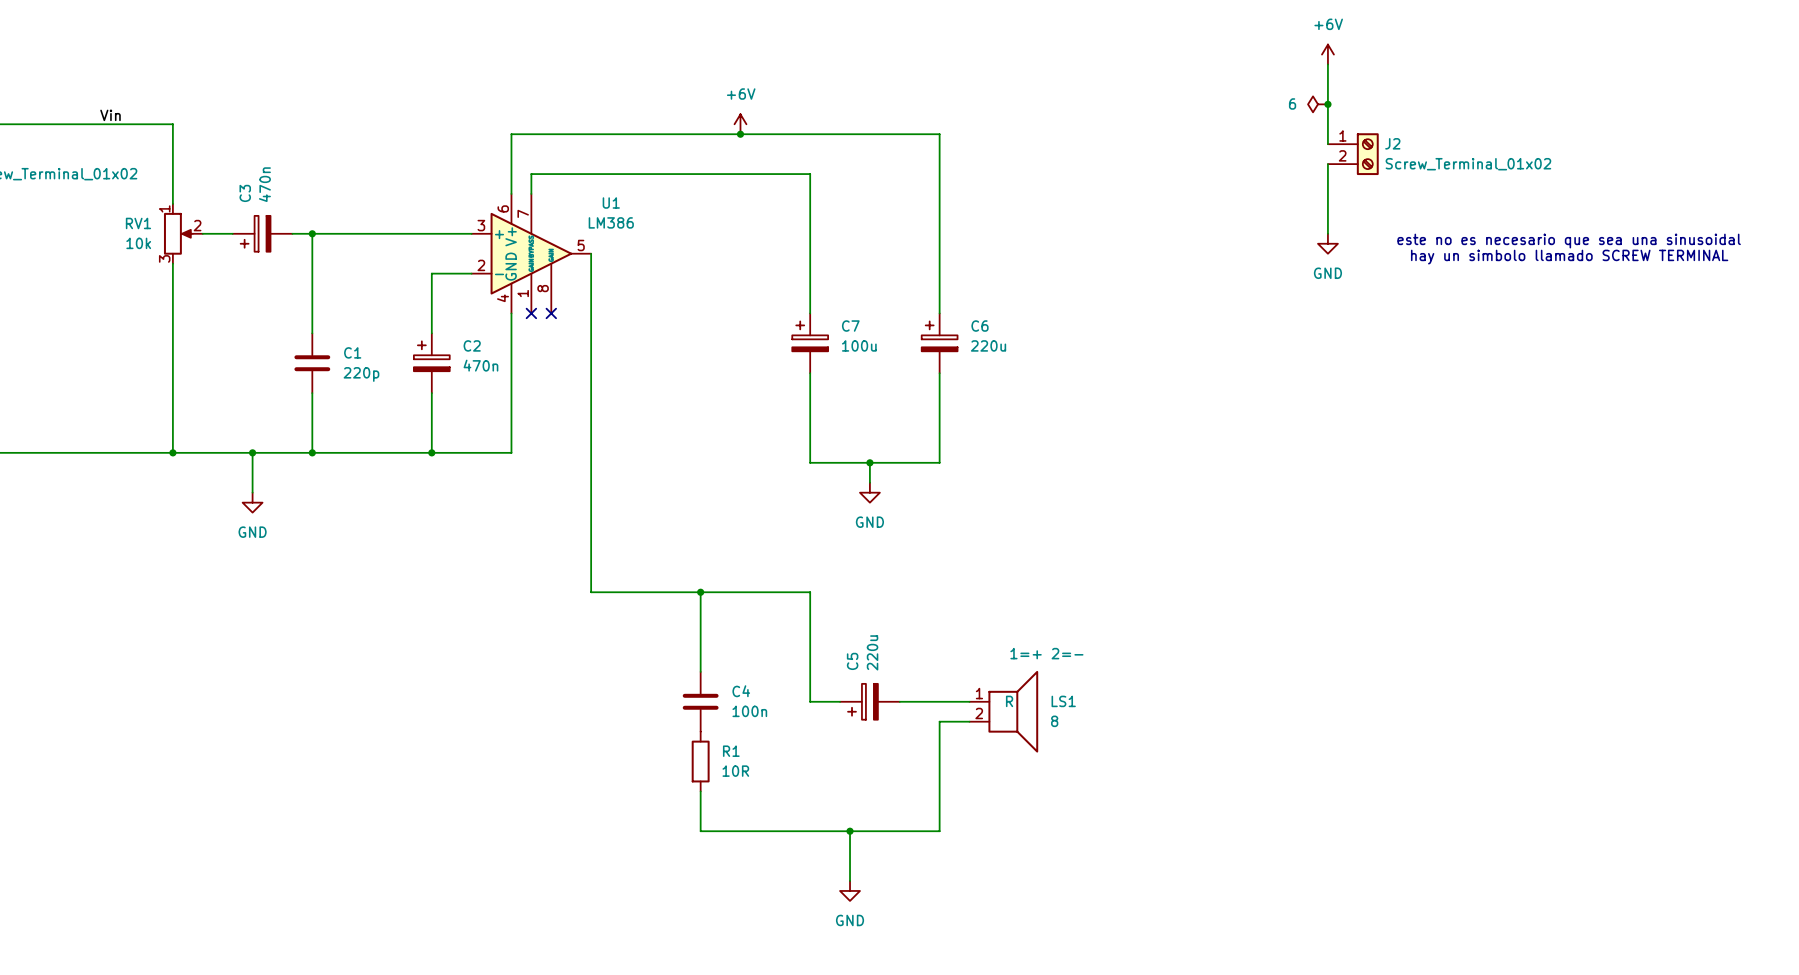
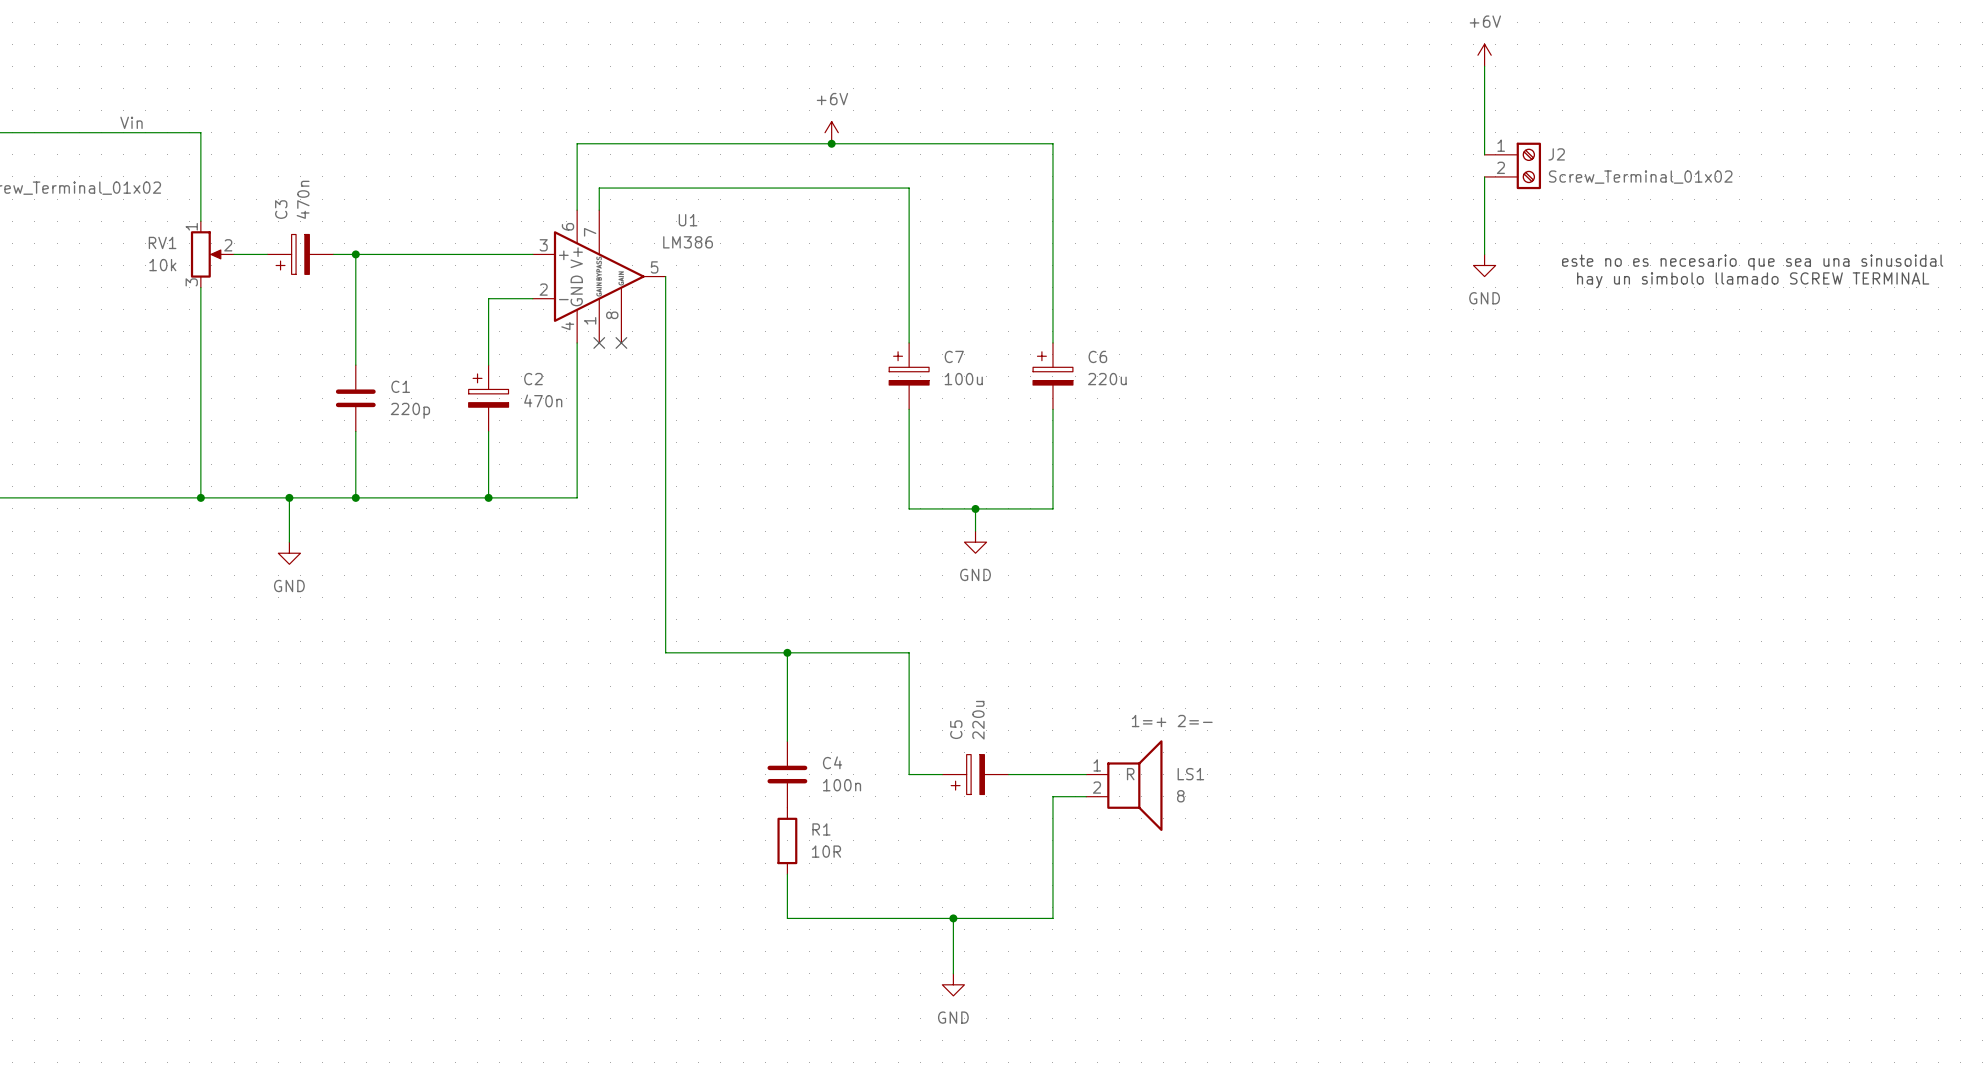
power symbol: 6 (1318, 104) -> none
junction: (1327, 104) -> none

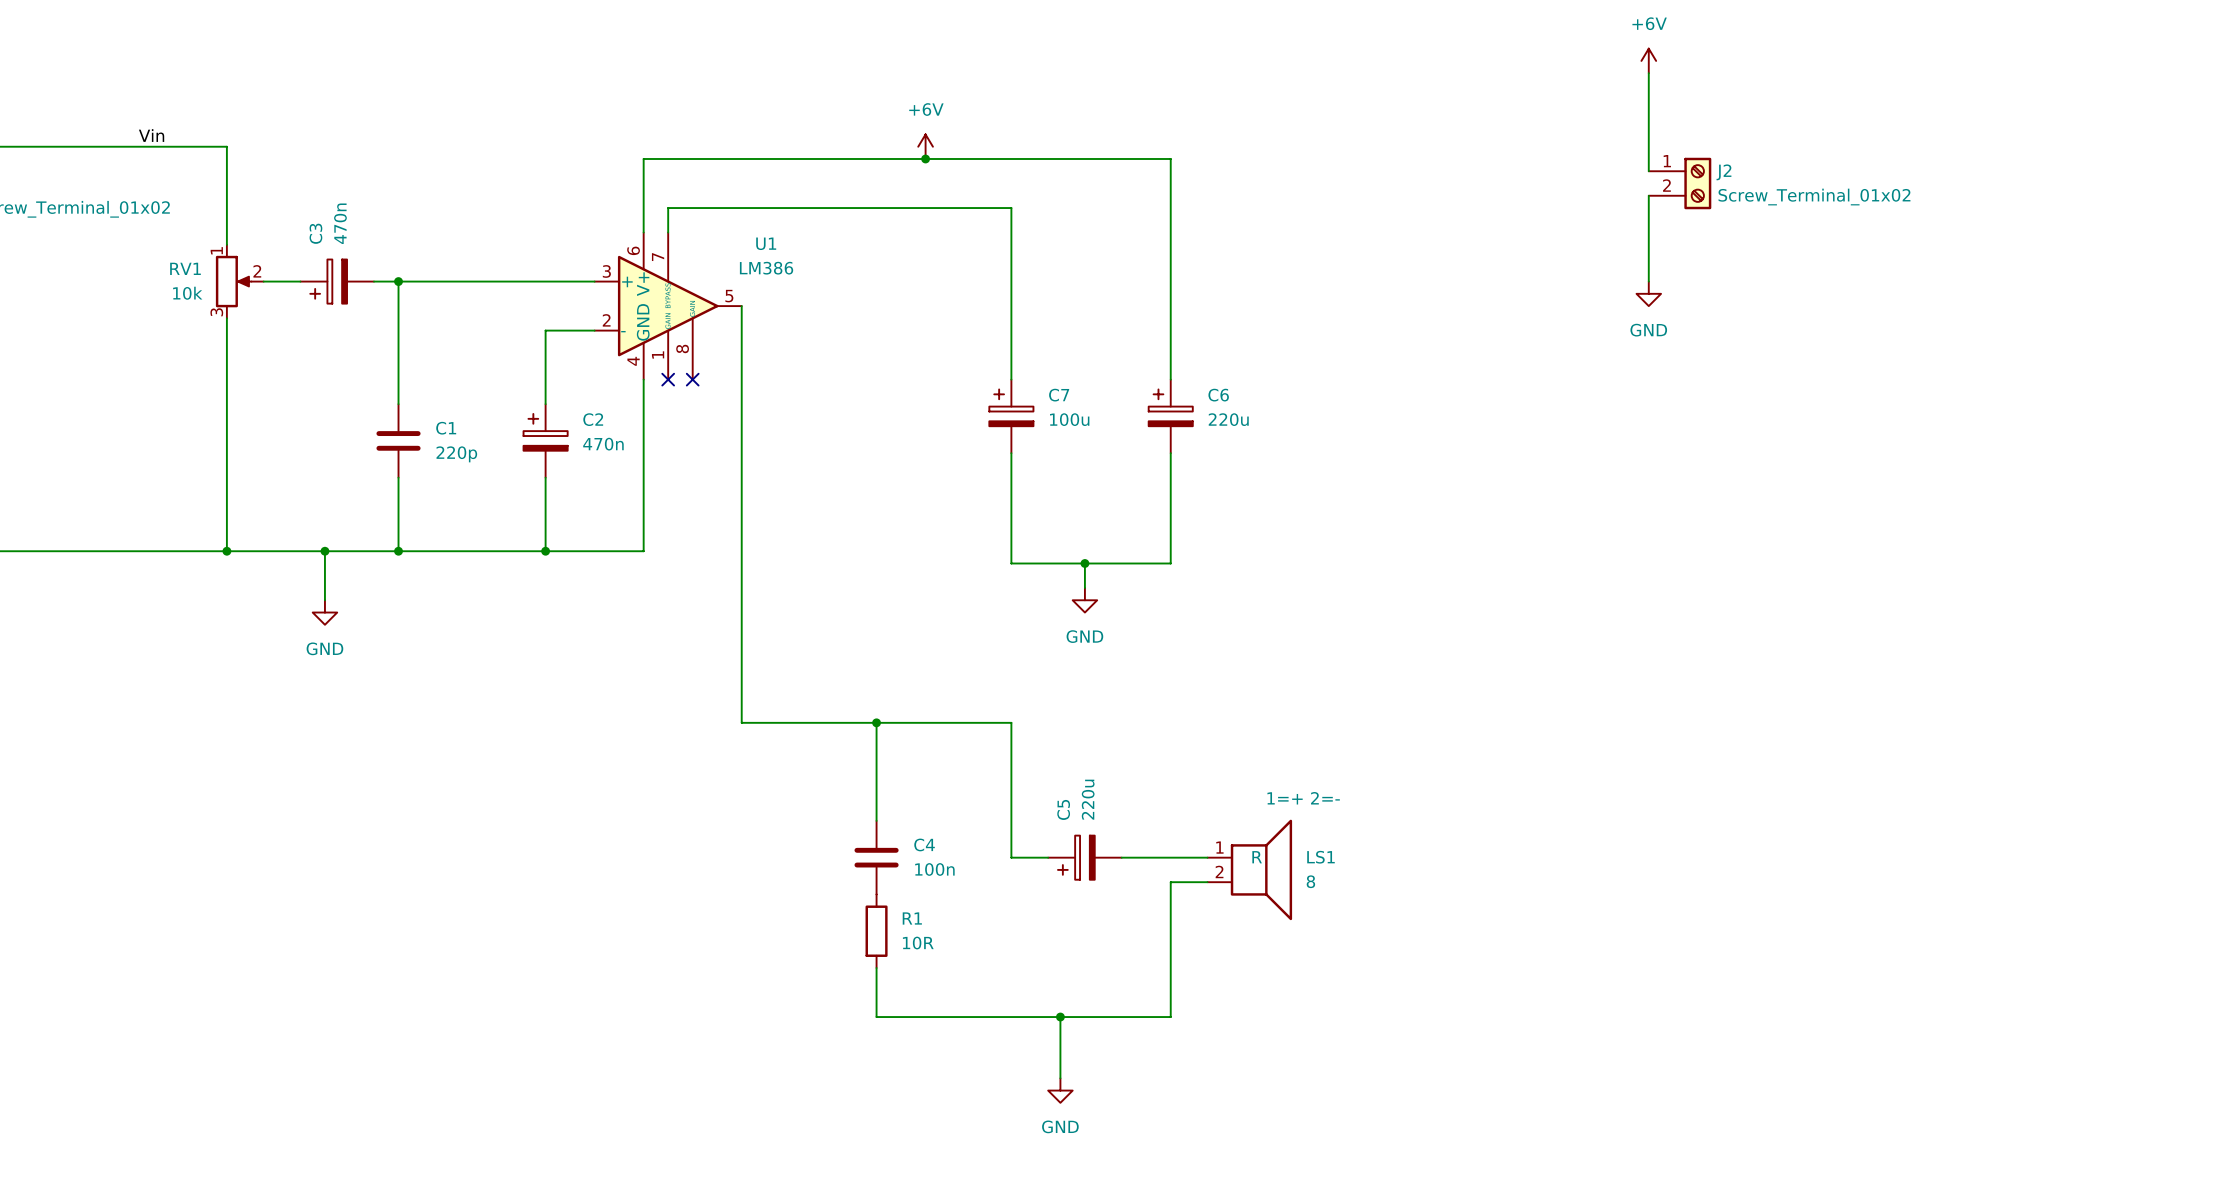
text: este no es necesario que sea una sinusoidal (1752, 262) -> none
text: hay un simbolo llamado SCREW TERMINAL (1753, 280) -> none

